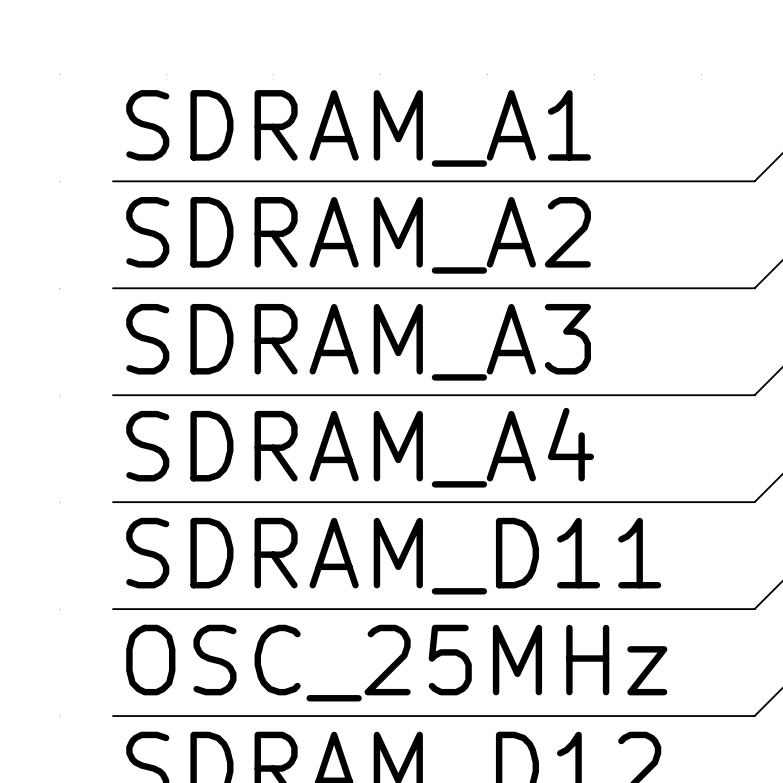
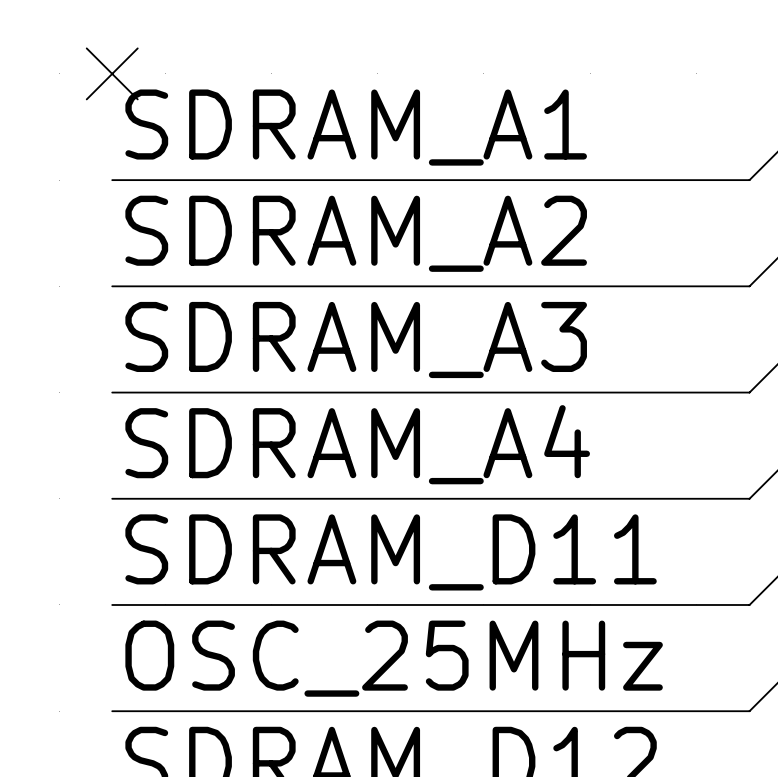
no-connect mark: none -> (112, 73)

